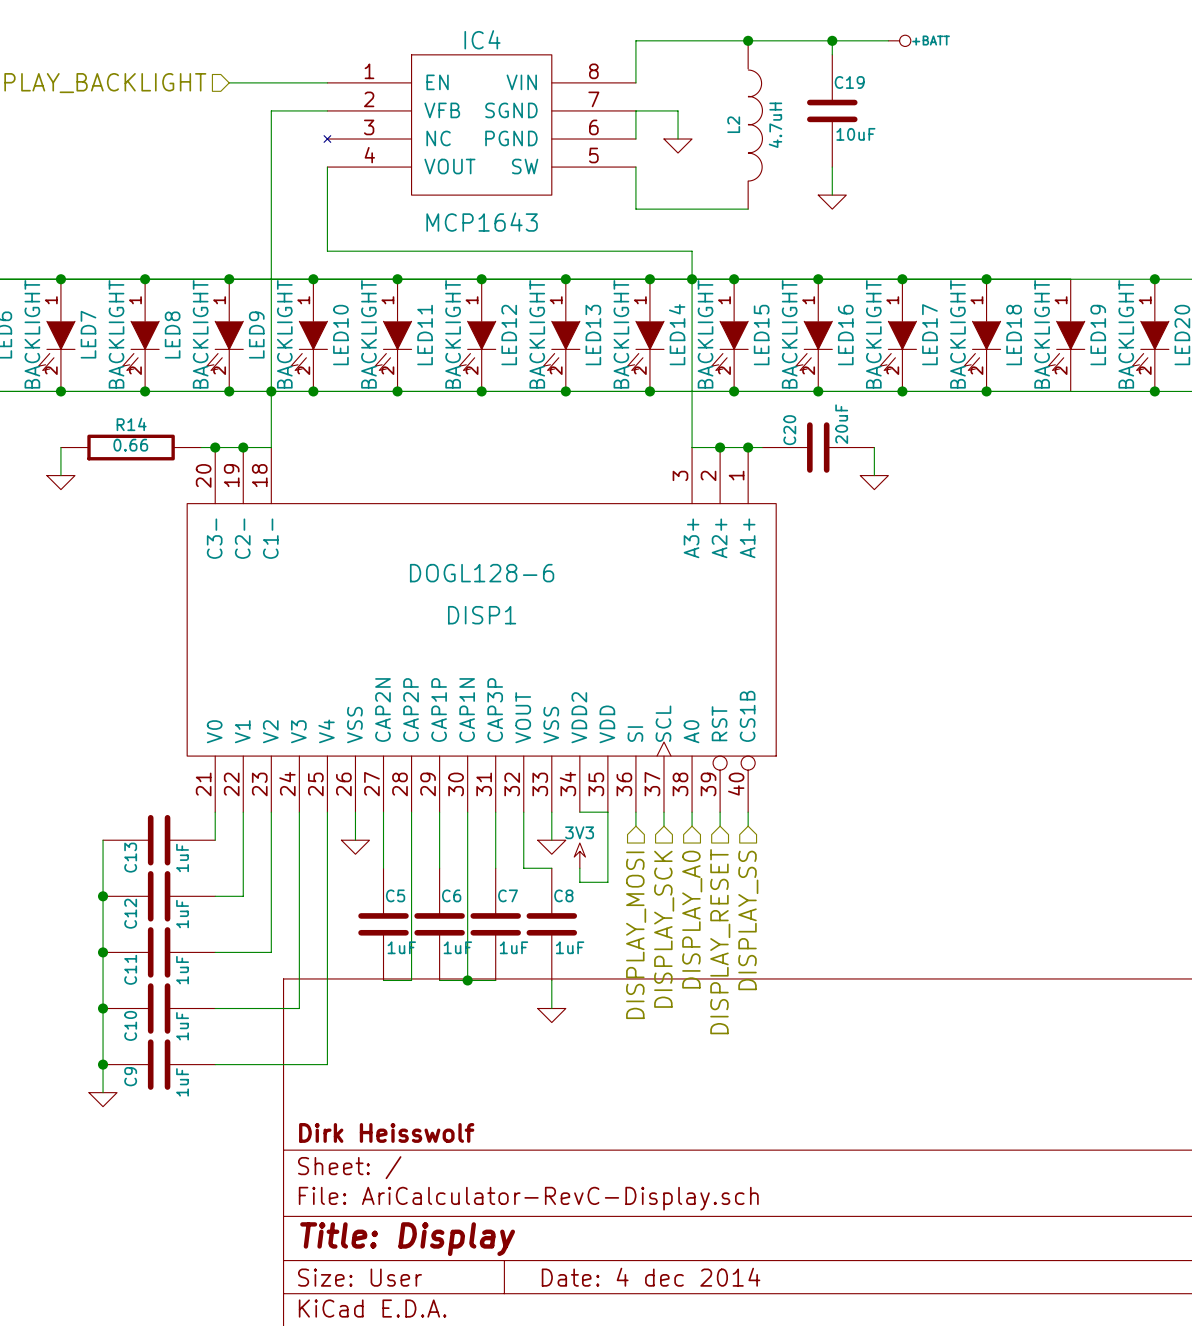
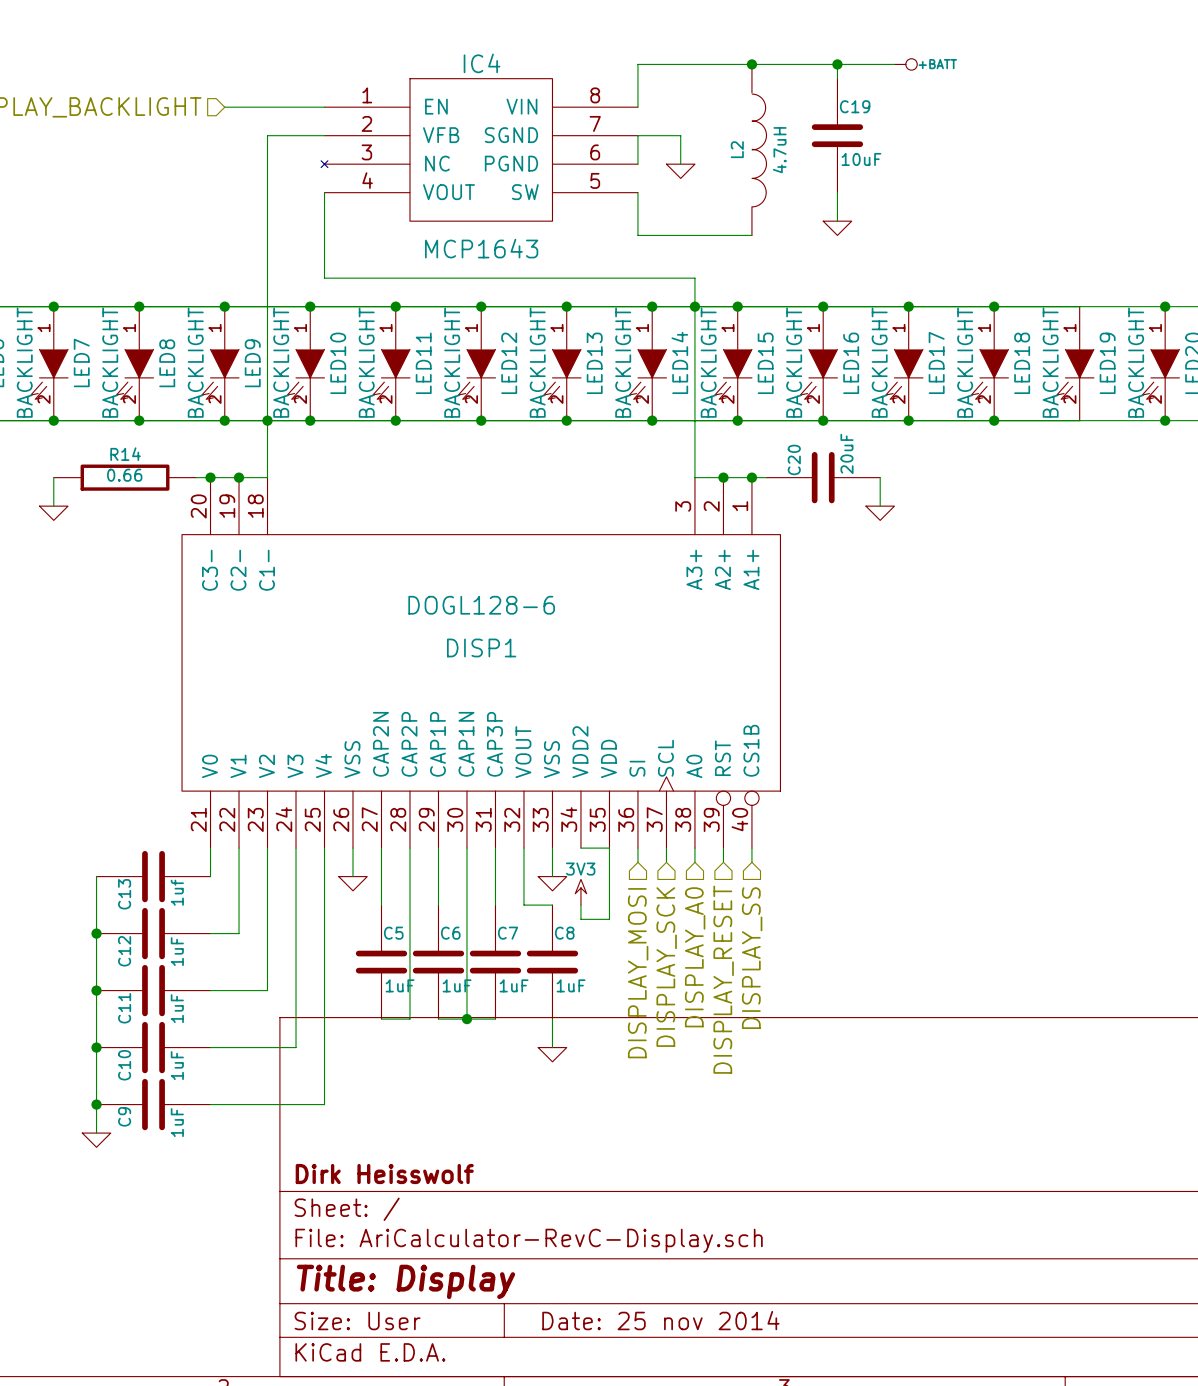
C13 value: 1uF (182, 857) -> 1uf (177, 892)
title block: Date: 4 dec 2014 (651, 1277) -> Date: 25 nov 2014 (660, 1320)

